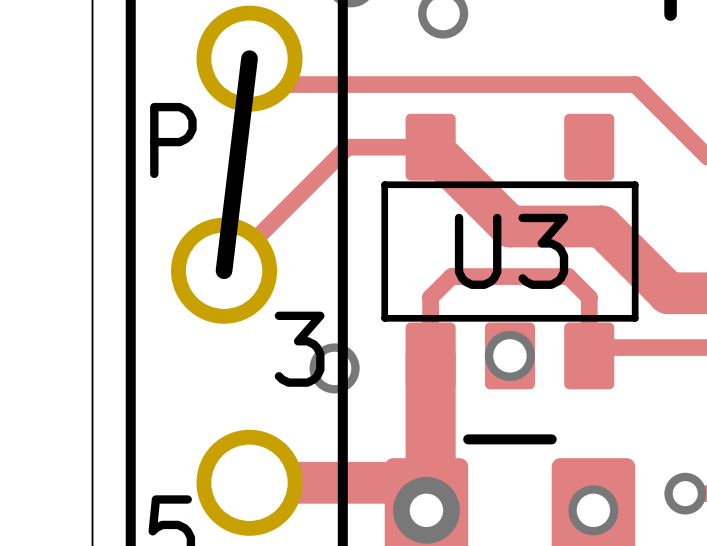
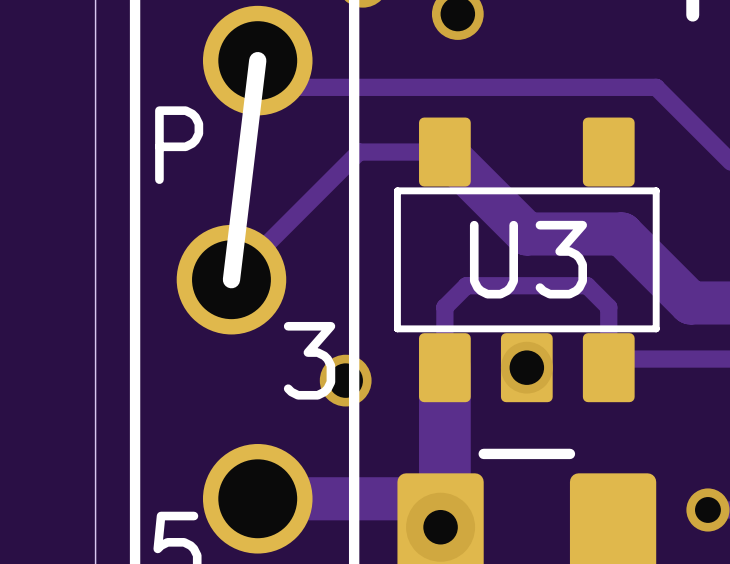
via: (593, 510) -> none

